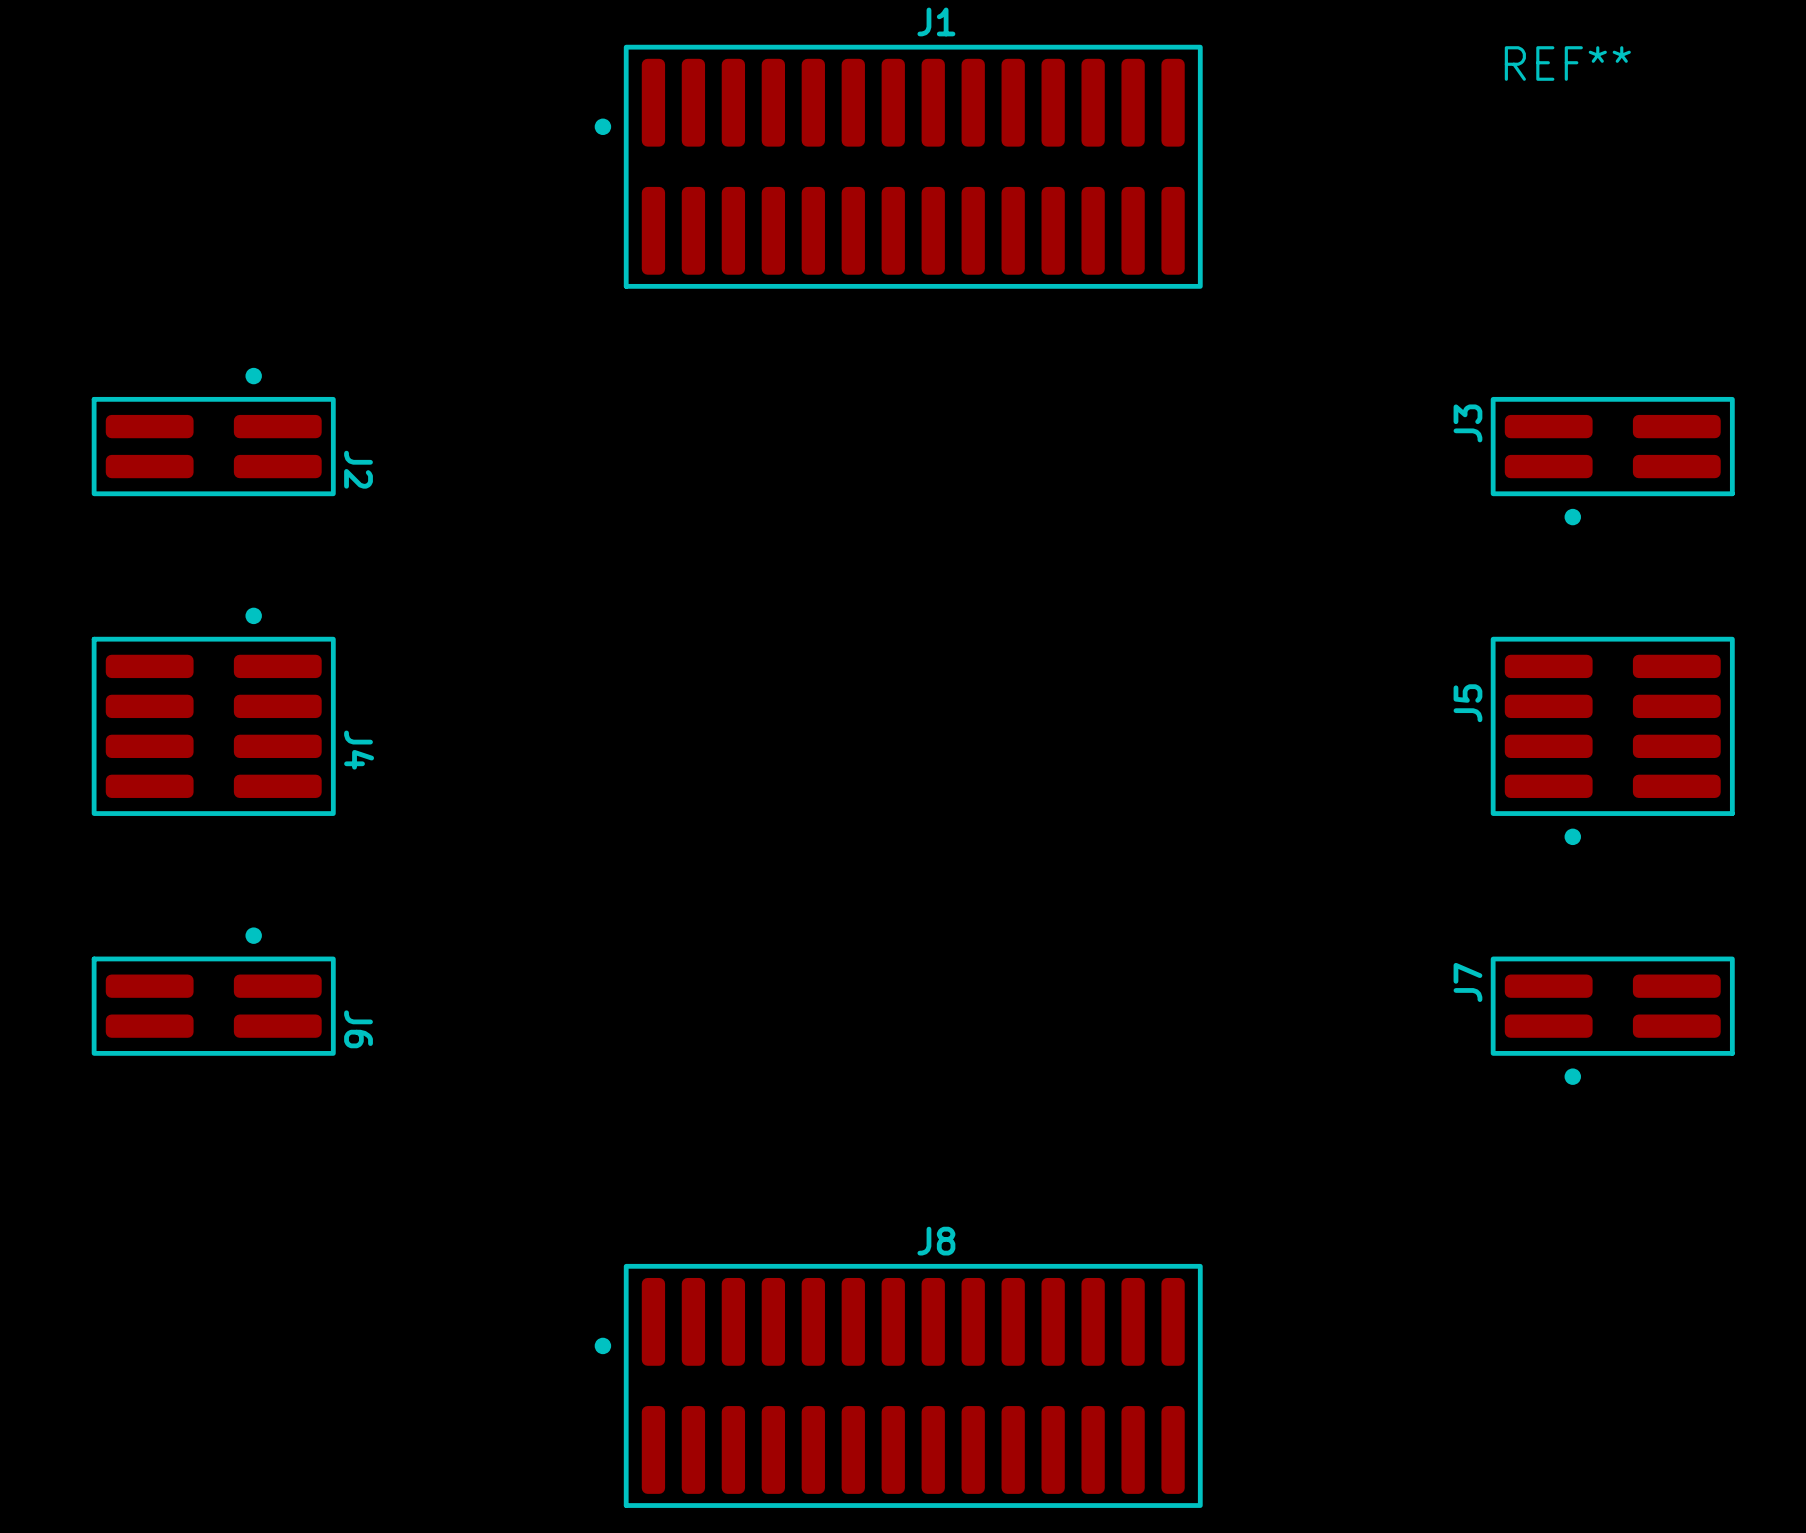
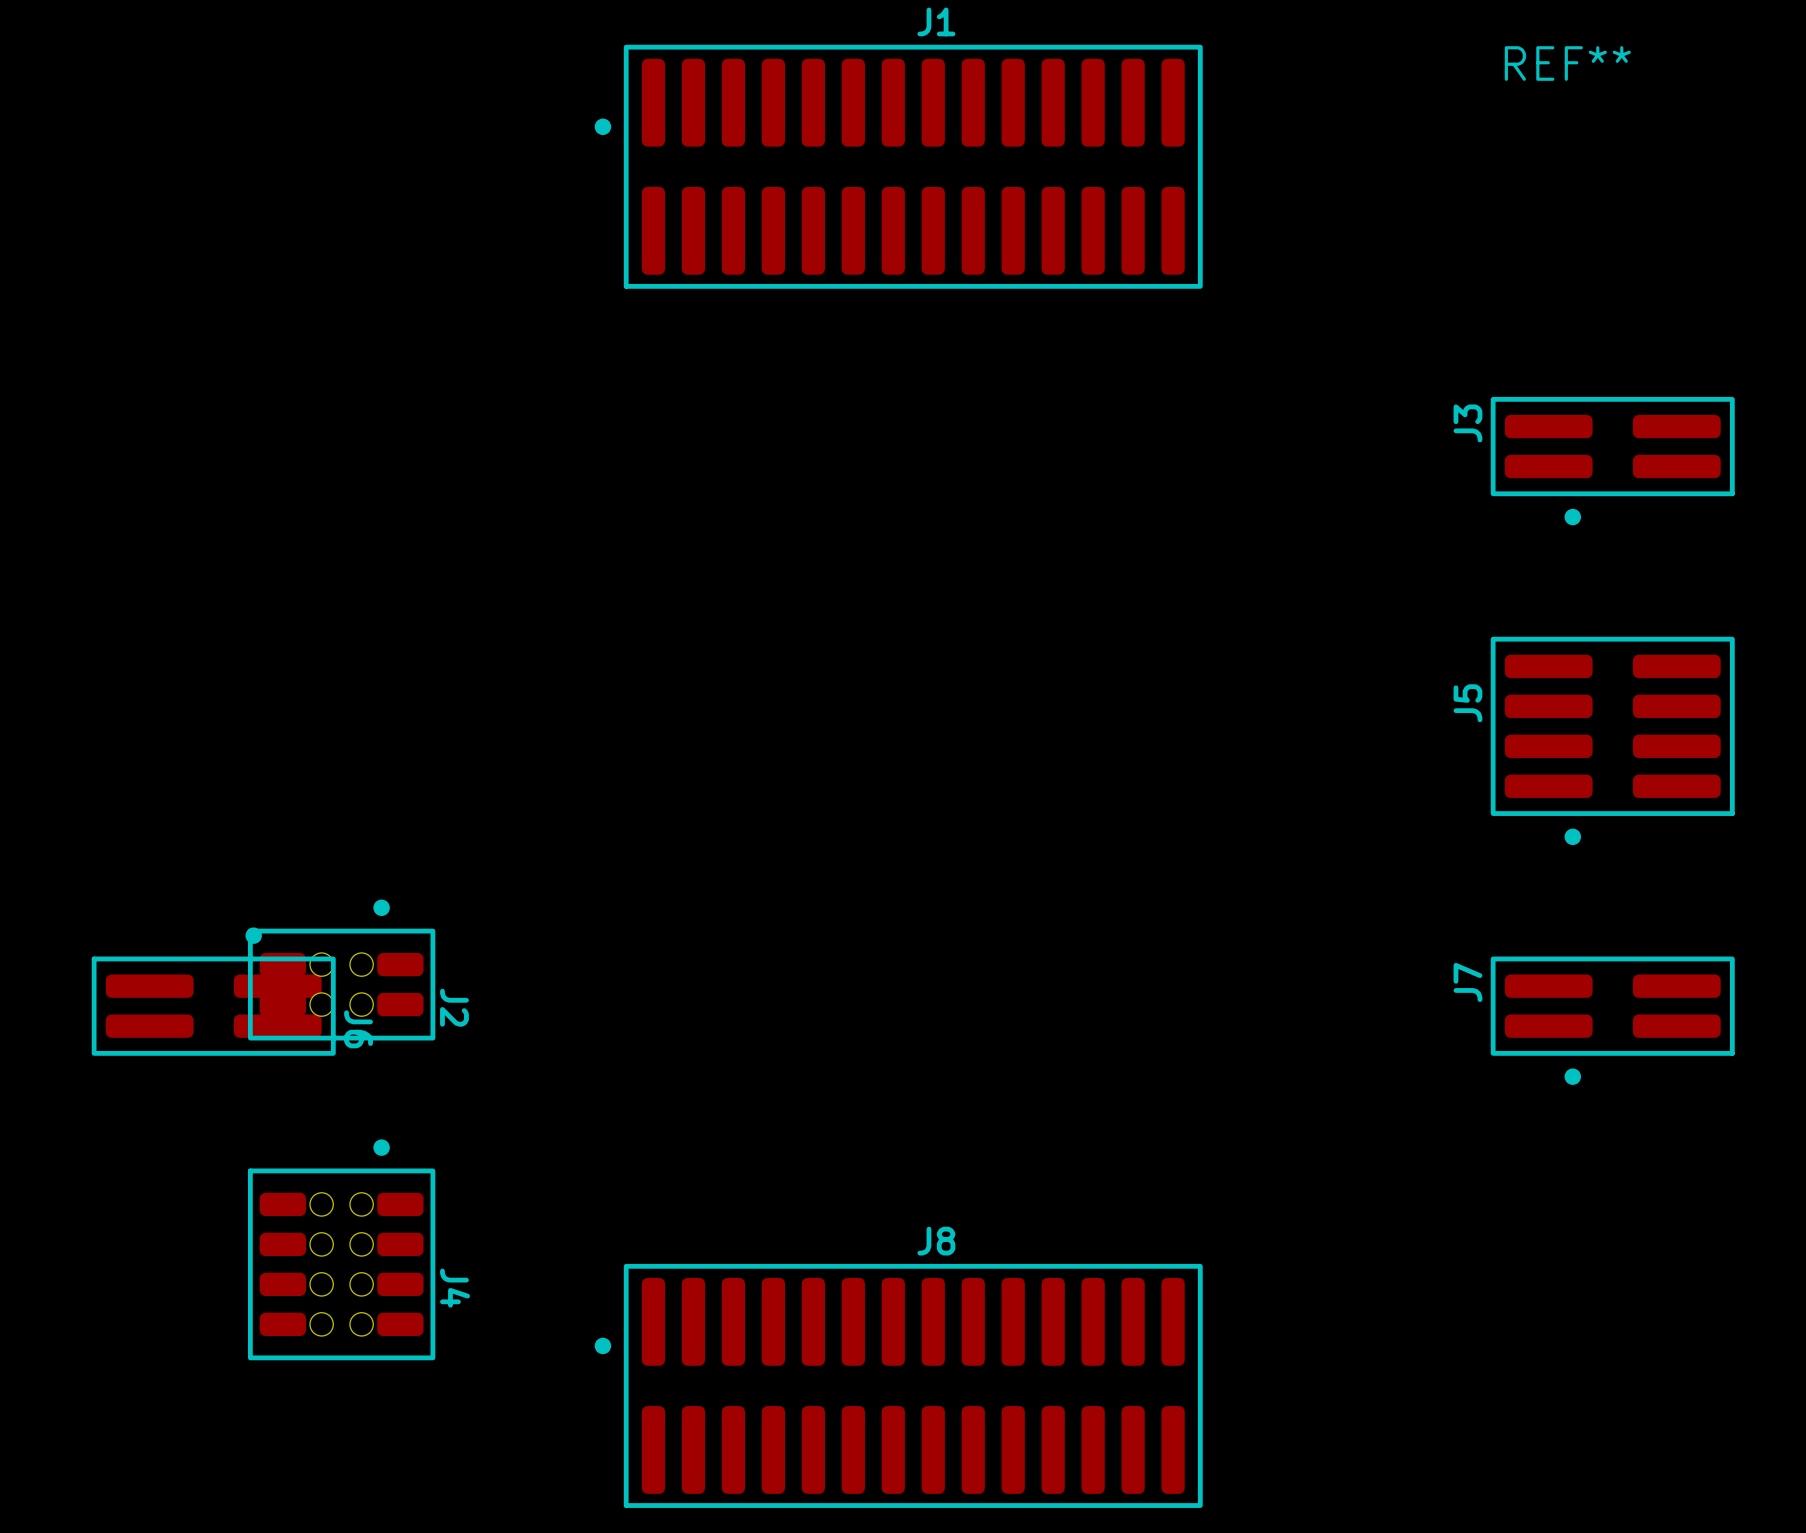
J2 footprint: [91, 367, 336, 497] -> [247, 899, 436, 1041]
J4 footprint: [91, 607, 336, 816] -> [247, 1139, 436, 1361]

